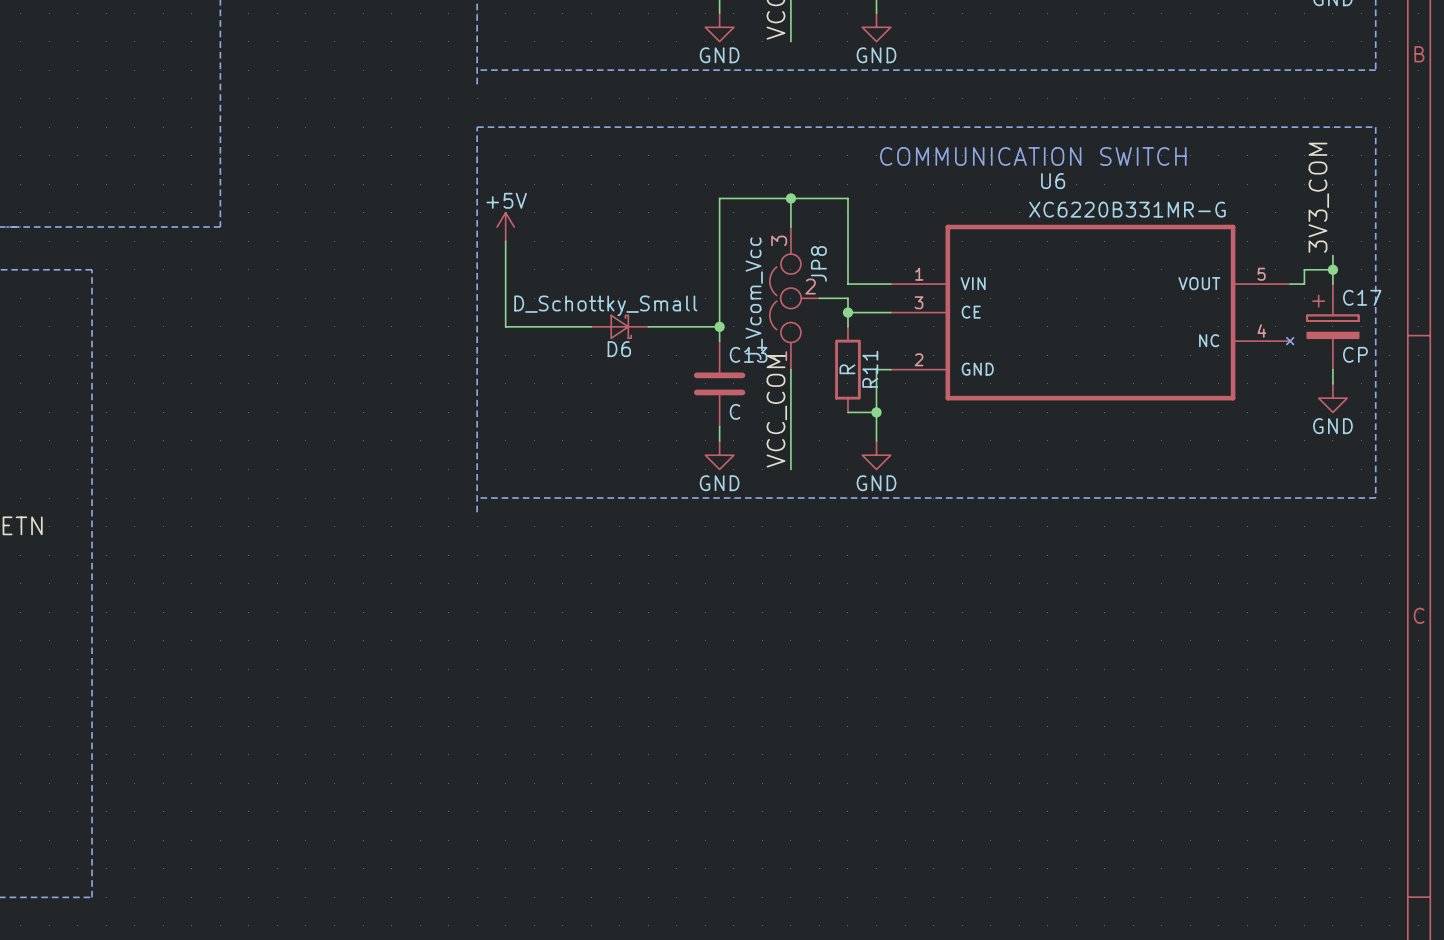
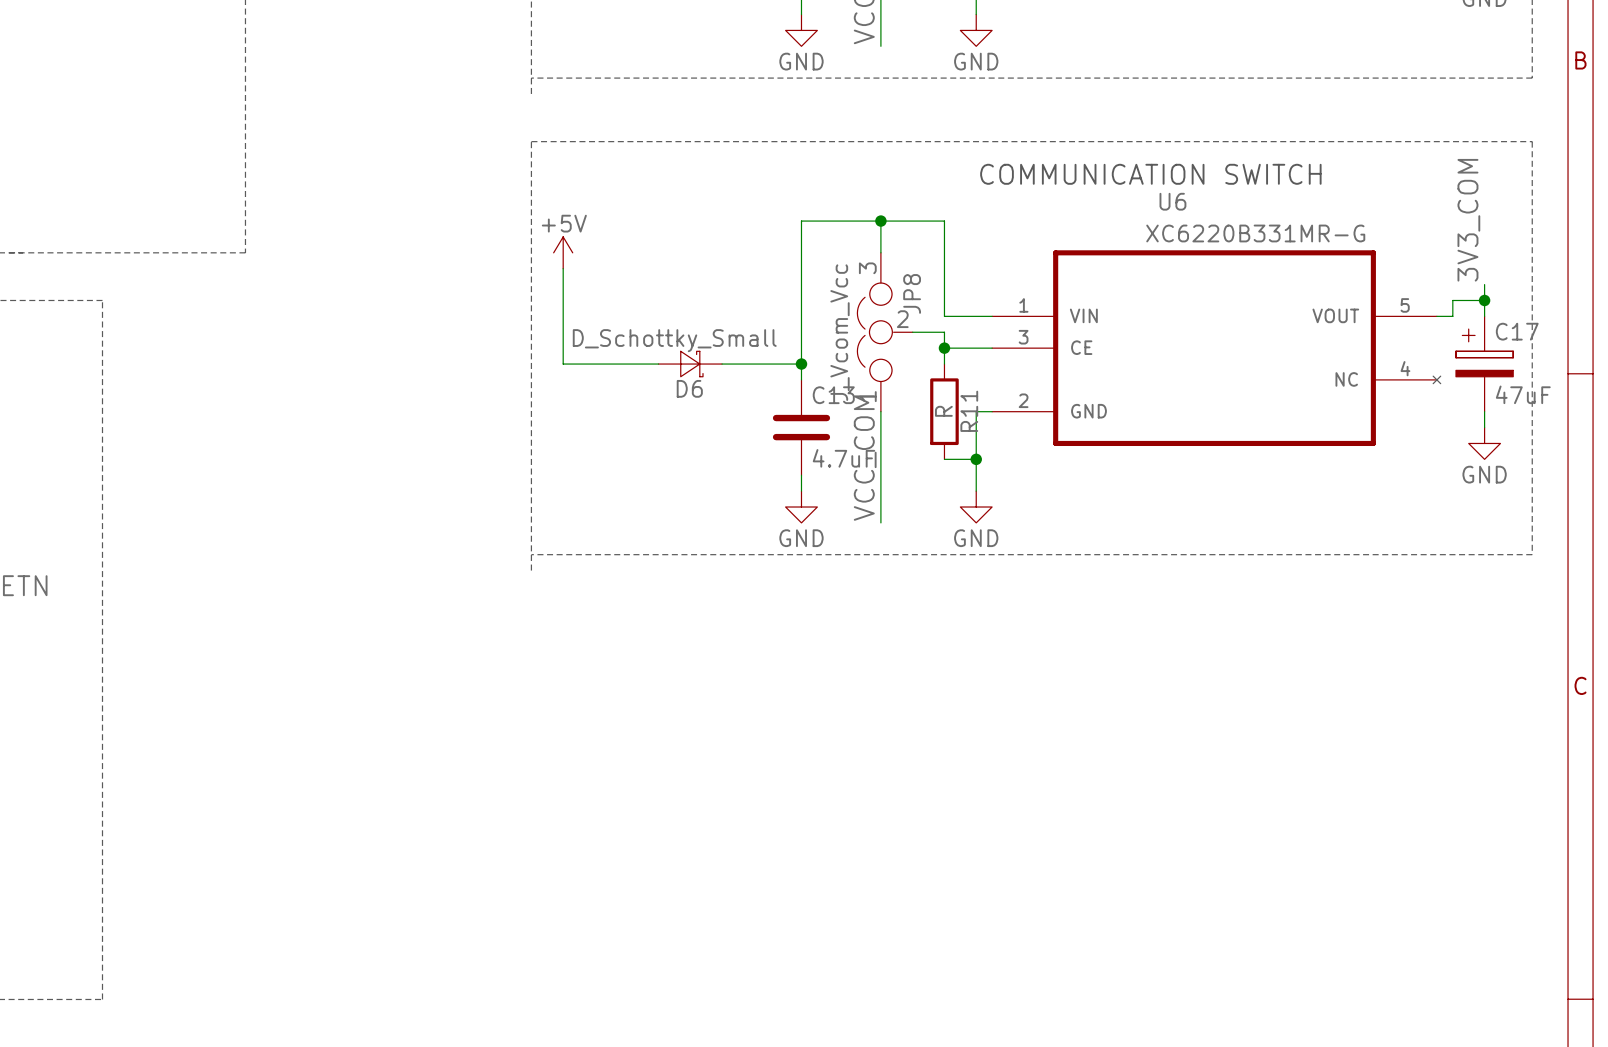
C17 value: CP (1355, 354) -> 47uF (1523, 394)
C13 value: C (735, 411) -> 4.7uF (843, 458)

